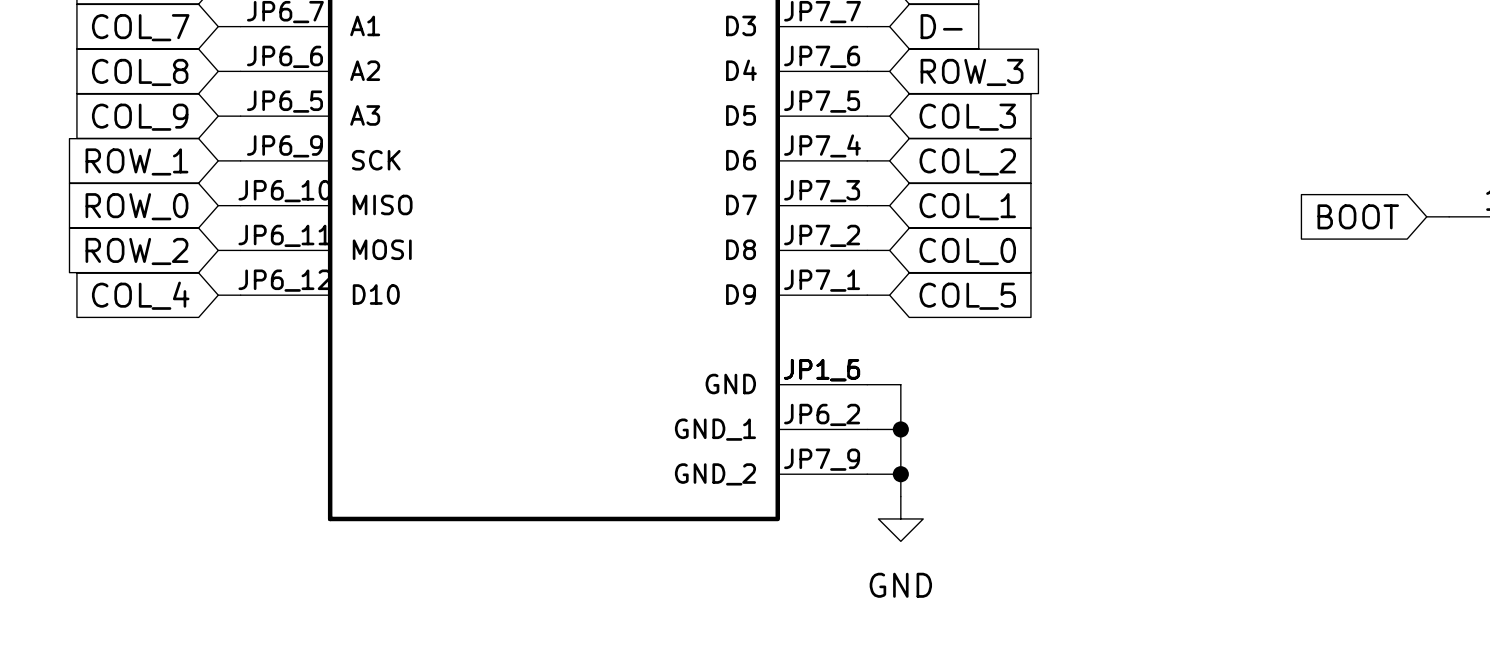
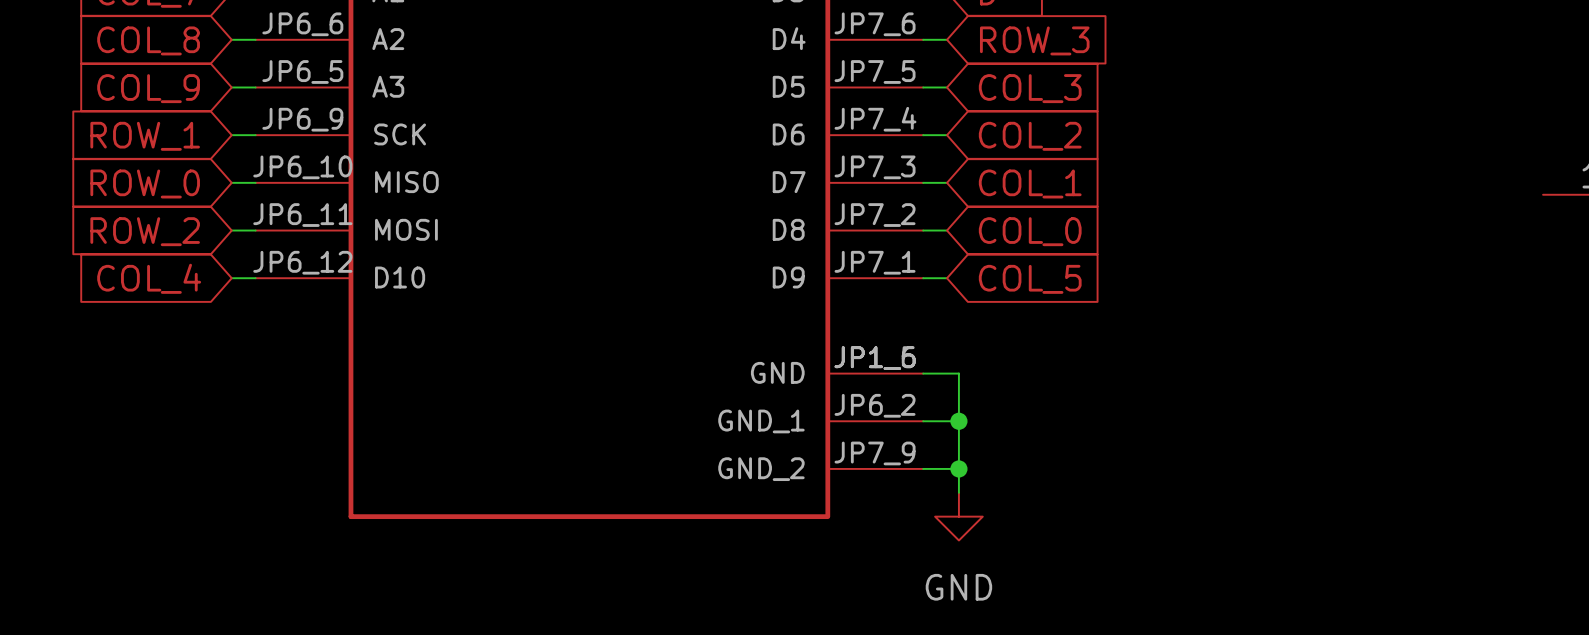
global label: BOOT (1358, 216) -> none
wire: (1426, 216) (1449, 216) -> none

